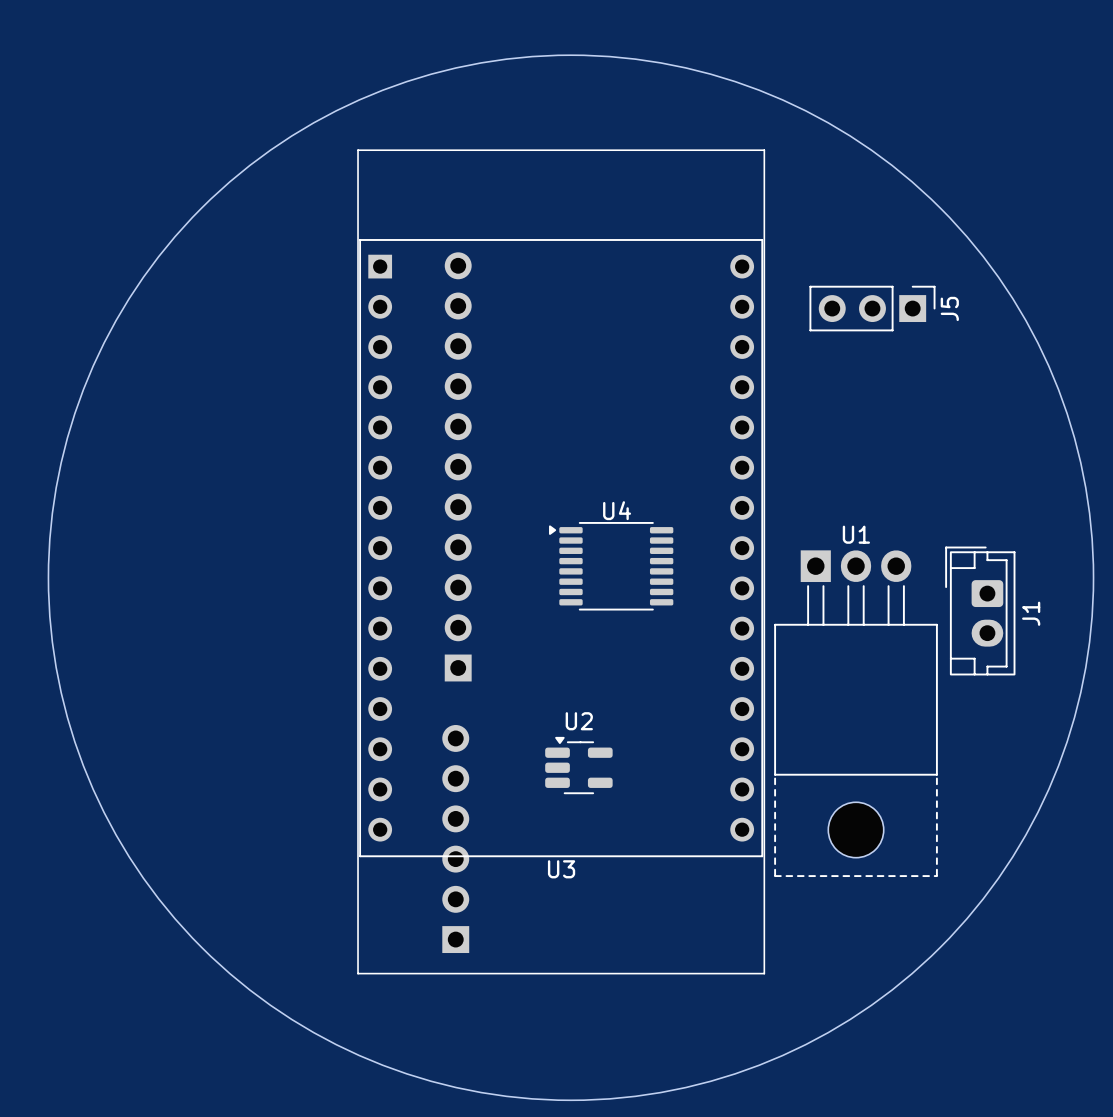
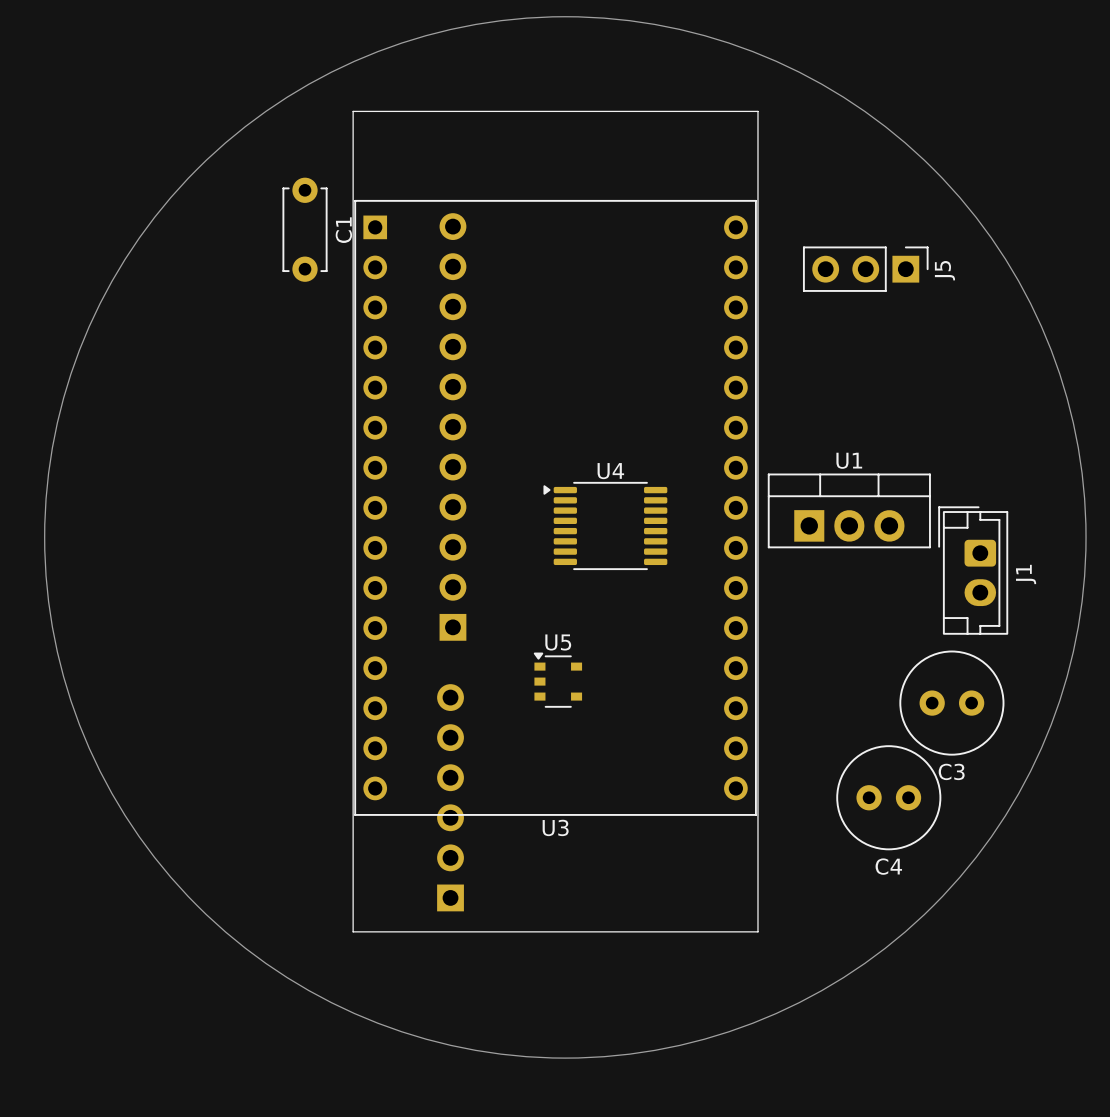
C1: none -> (305, 229)
U1 name position: U1 (856, 534) -> U1 (849, 460)
U1 footprint: [774, 550, 938, 878] -> [767, 473, 931, 549]
U5: none -> (557, 680)
C3: none -> (951, 703)
U2: (578, 765) -> none
C4: none -> (888, 797)

